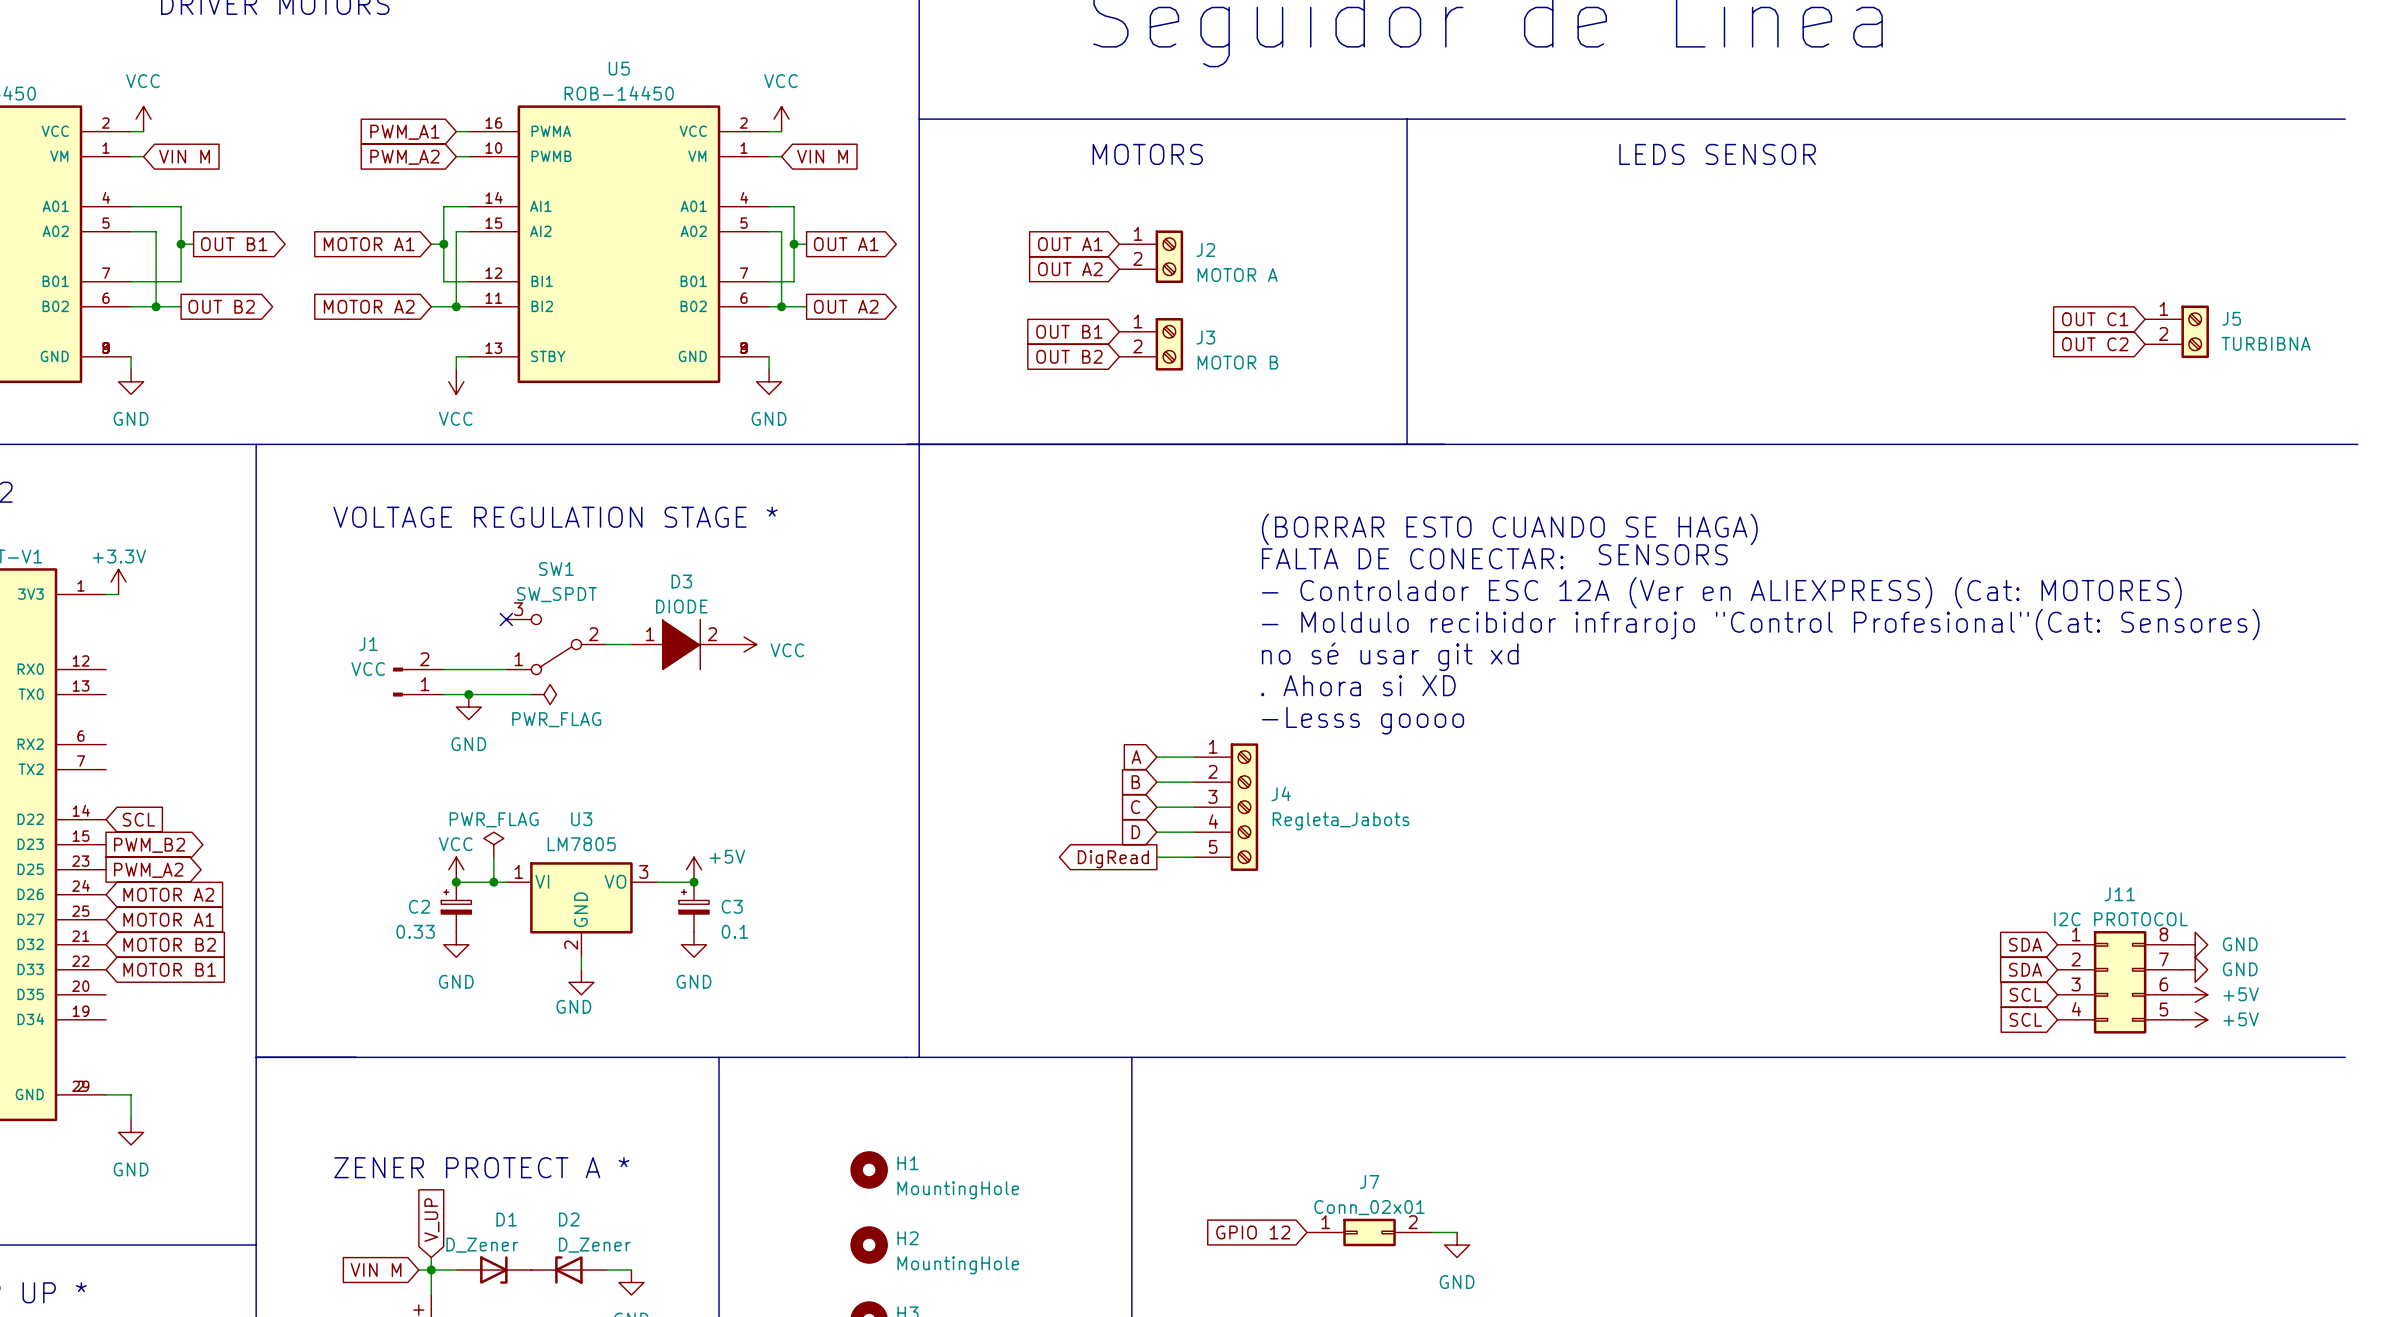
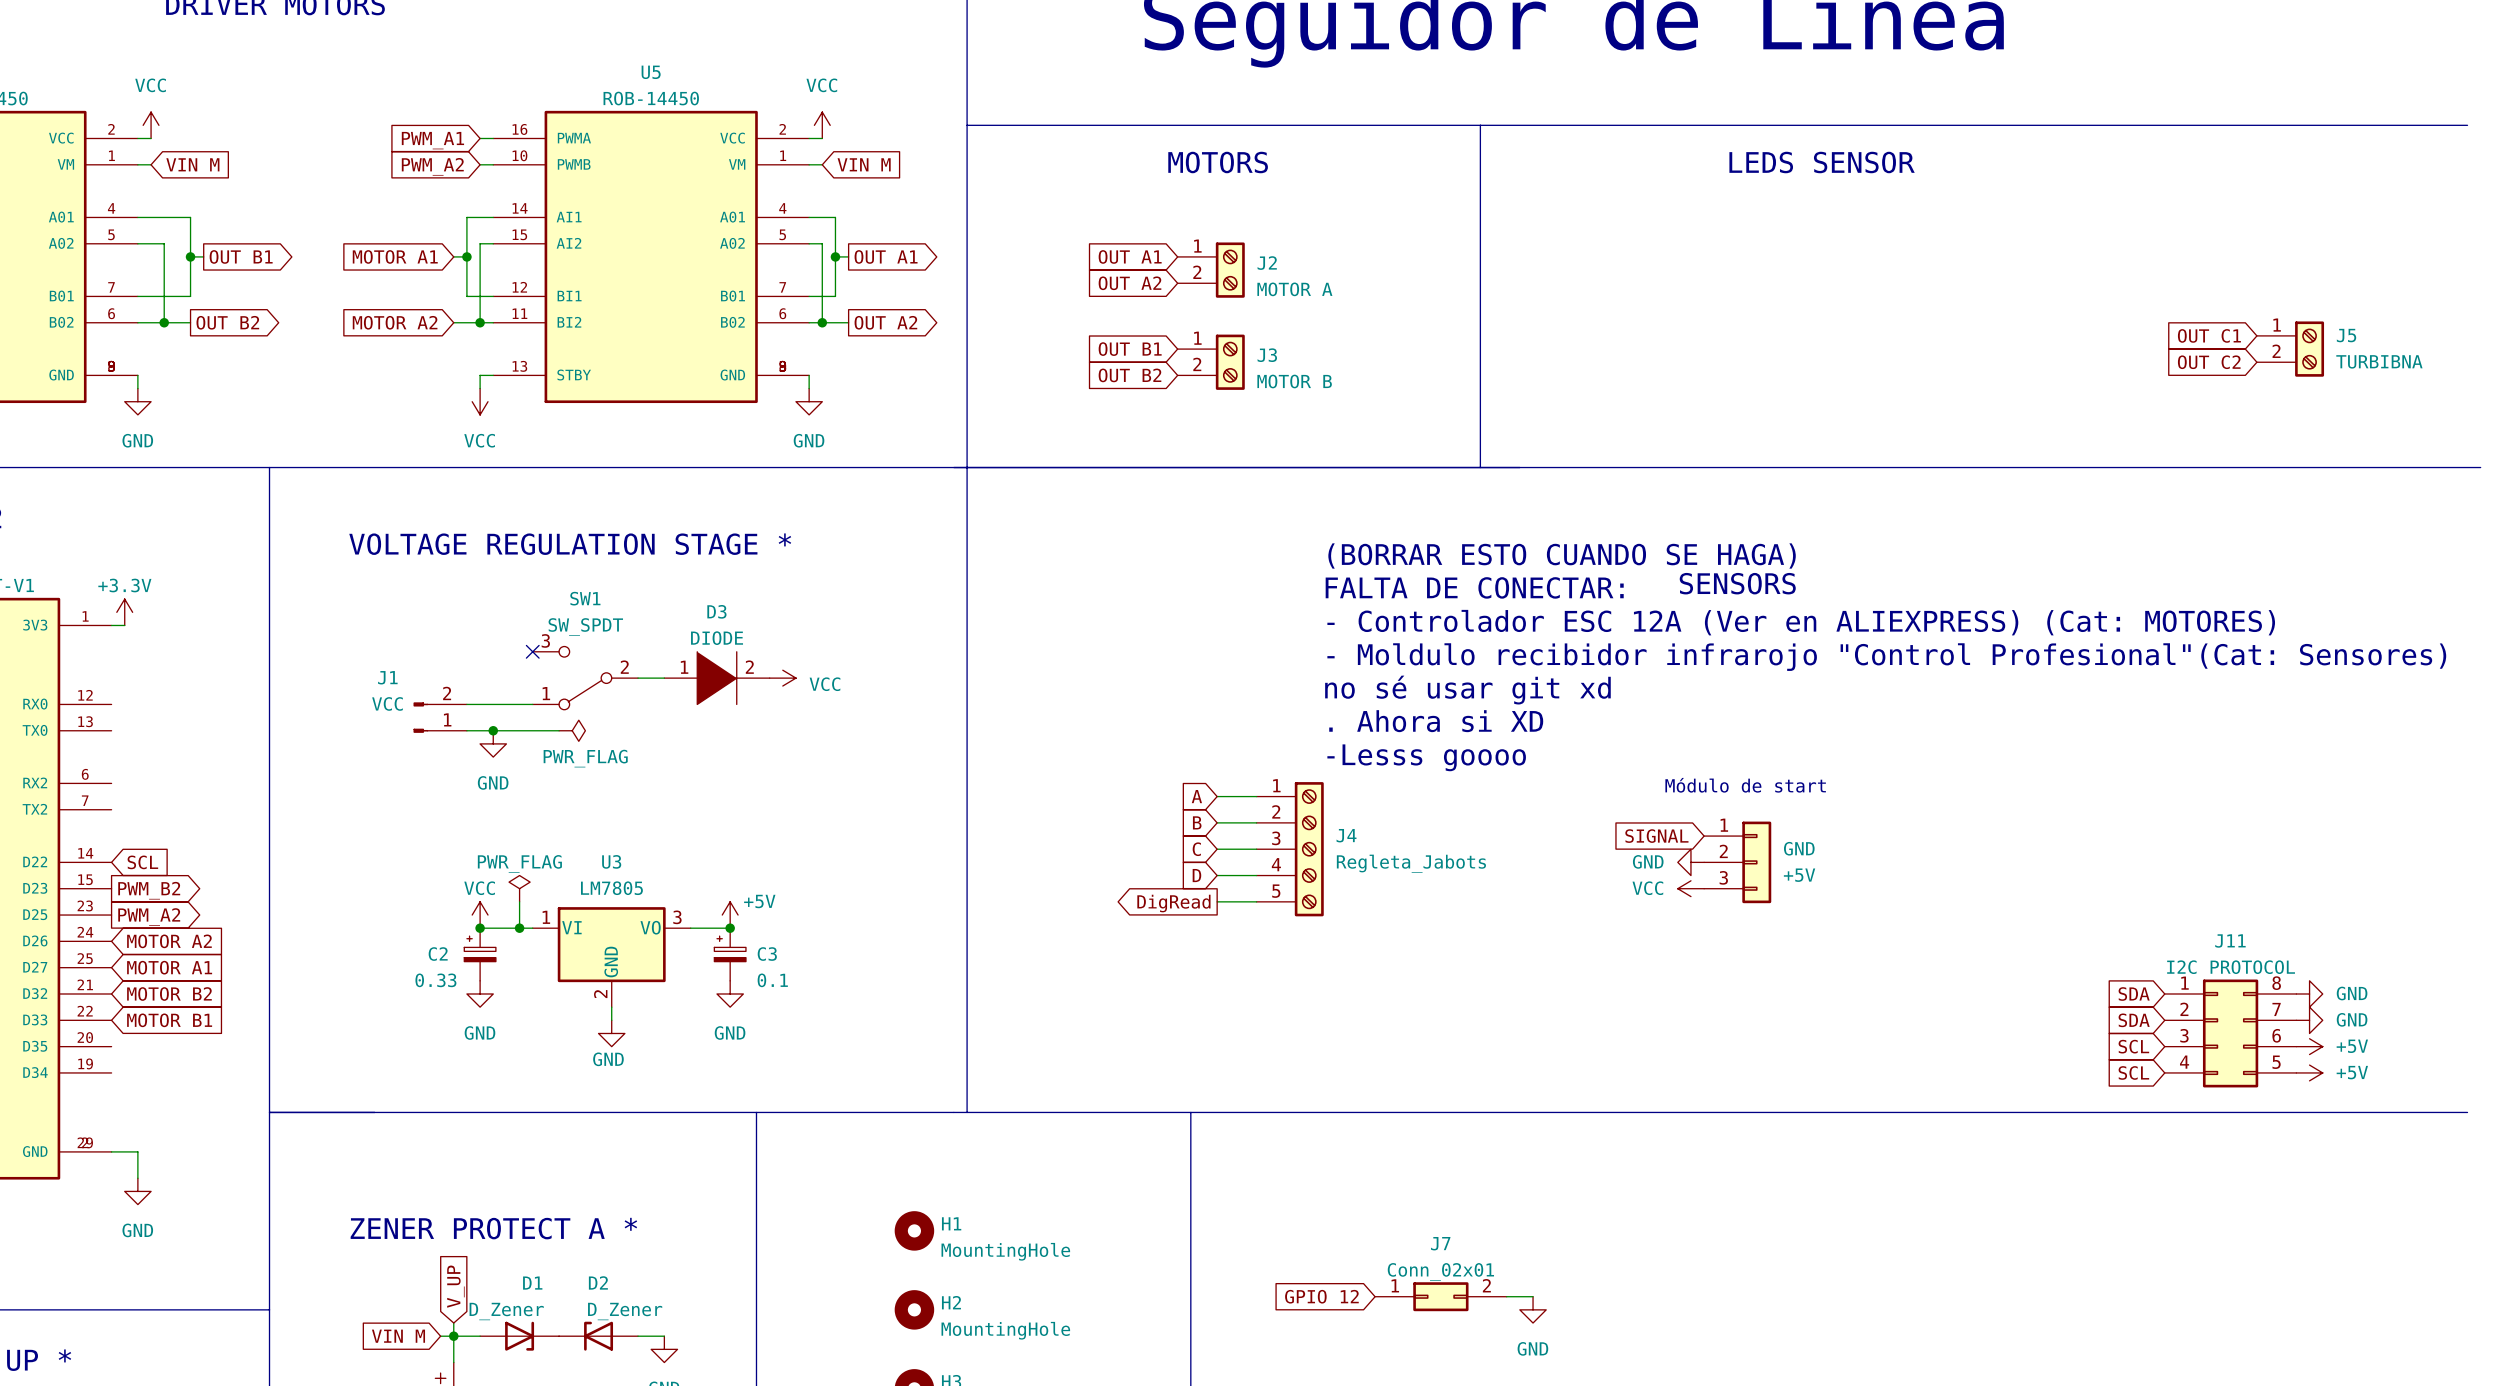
text: none -> Módulo de start (1745, 785)
global label: none -> SIGNAL (1656, 836)
power symbol: none -> GND (1690, 862)
GND: none -> +5V (1737, 862)
power symbol: none -> VCC (1690, 888)

